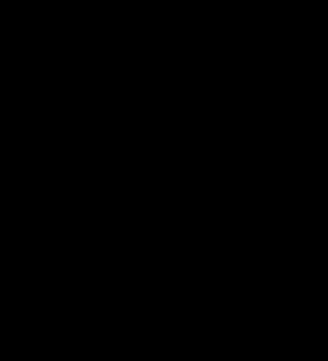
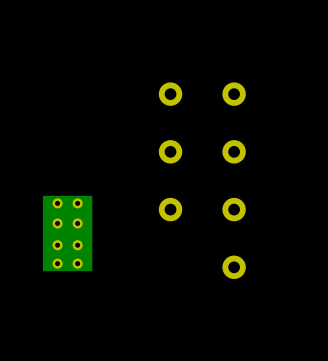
part: none -> (170, 94)
part: none -> (234, 94)
part: none -> (170, 151)
part: none -> (234, 151)
part: none -> (170, 209)
part: none -> (234, 209)
part: none -> (67, 233)
part: none -> (234, 267)

